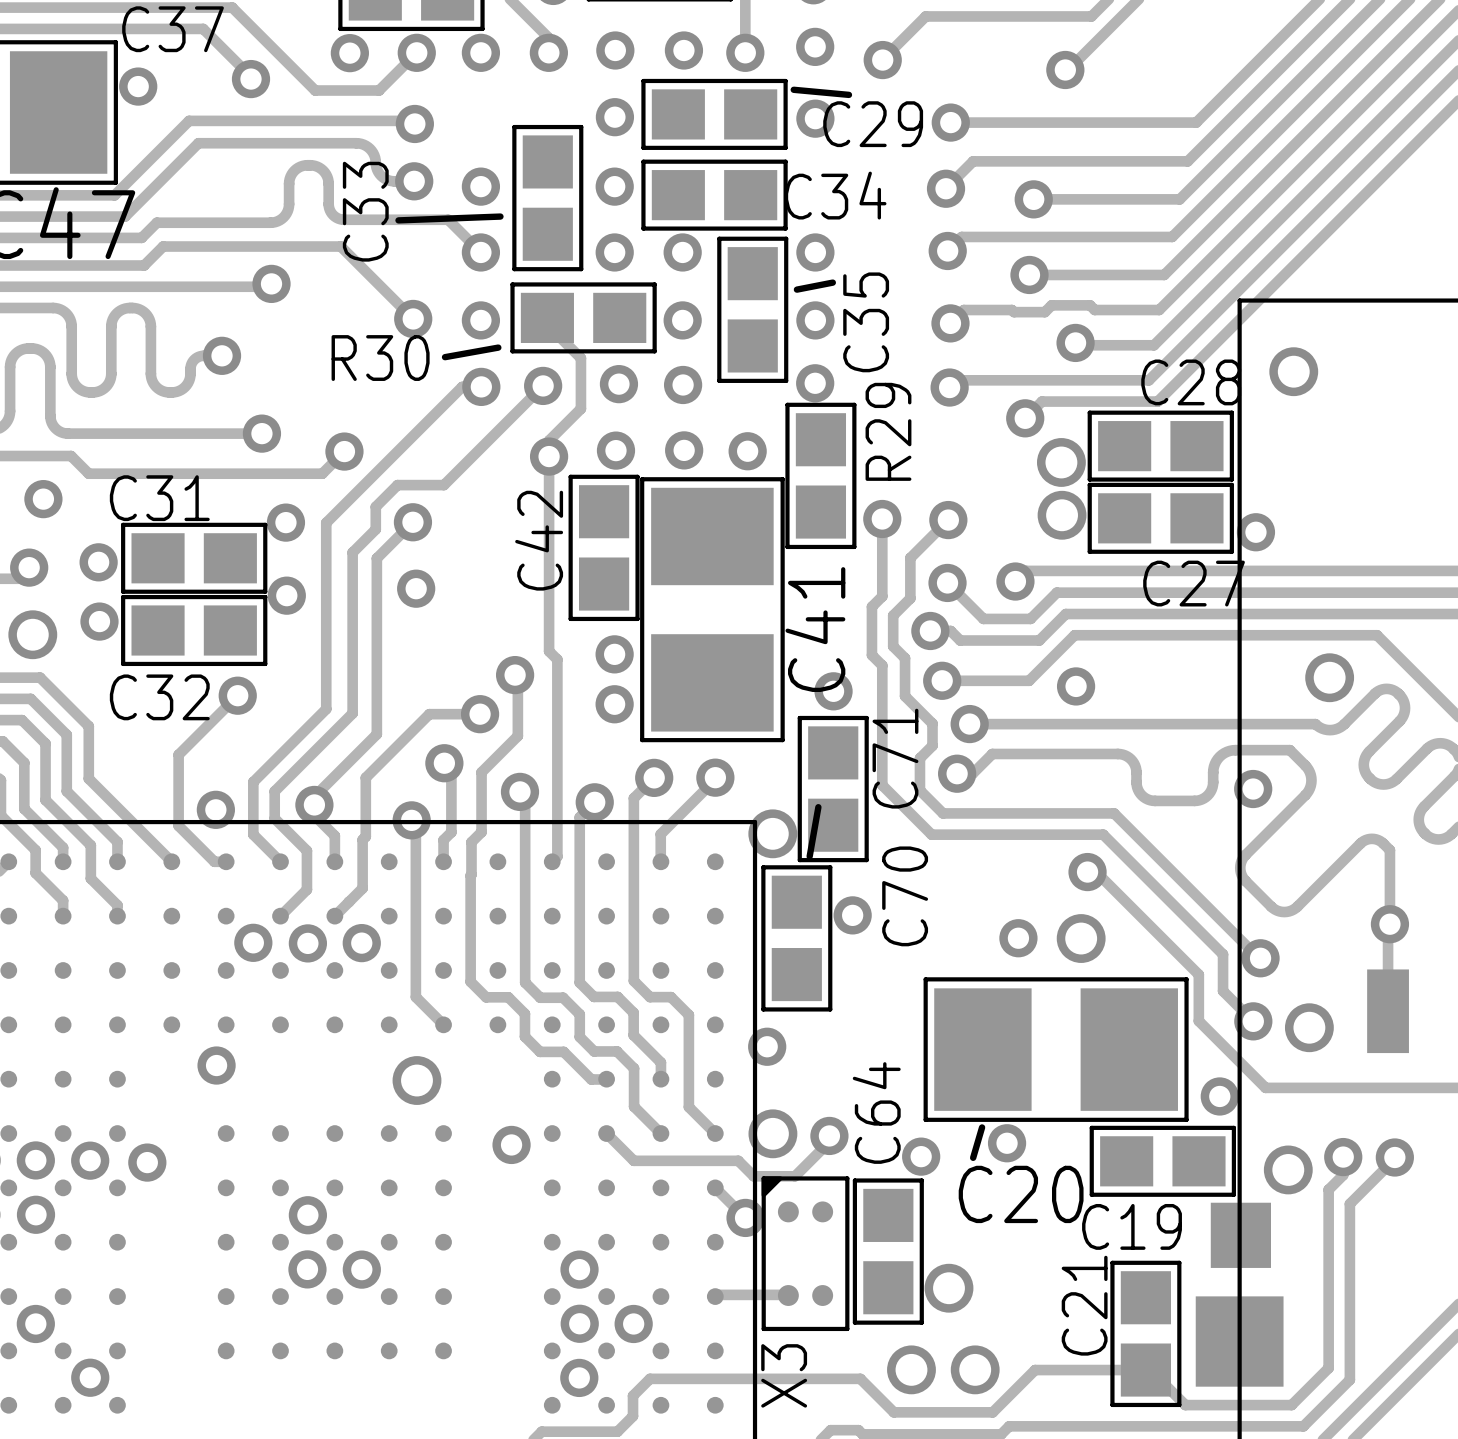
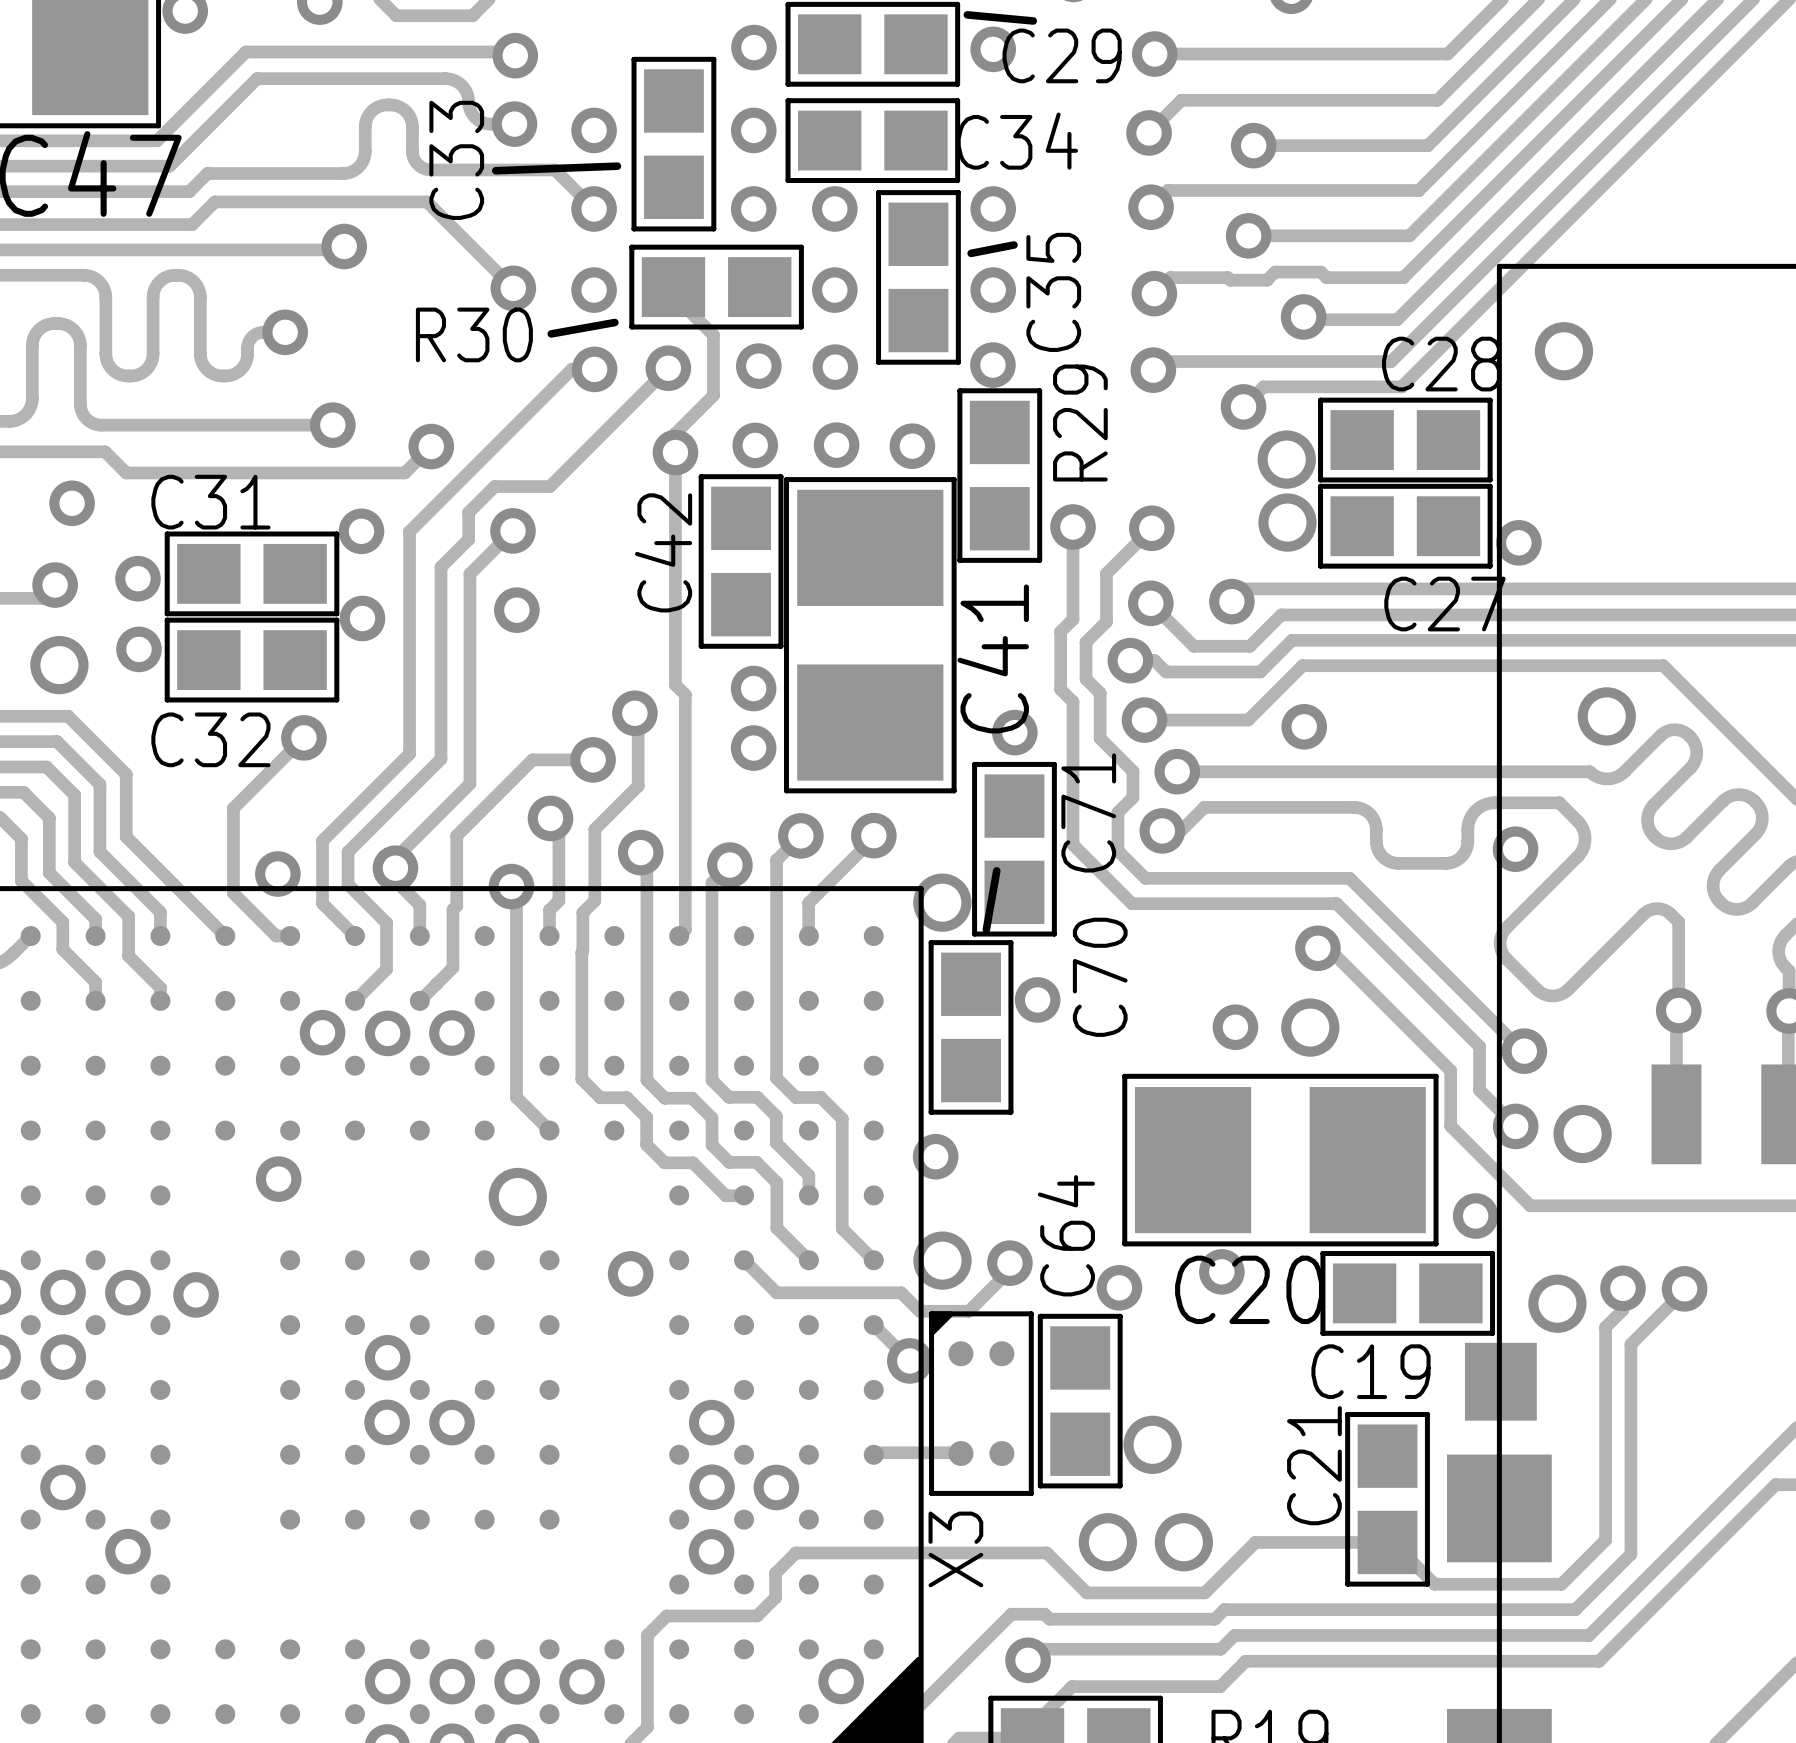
line: (982, 1127) (973, 1157) -> none
C20 name position: C20 (1021, 1194) -> C20 (1249, 1289)

